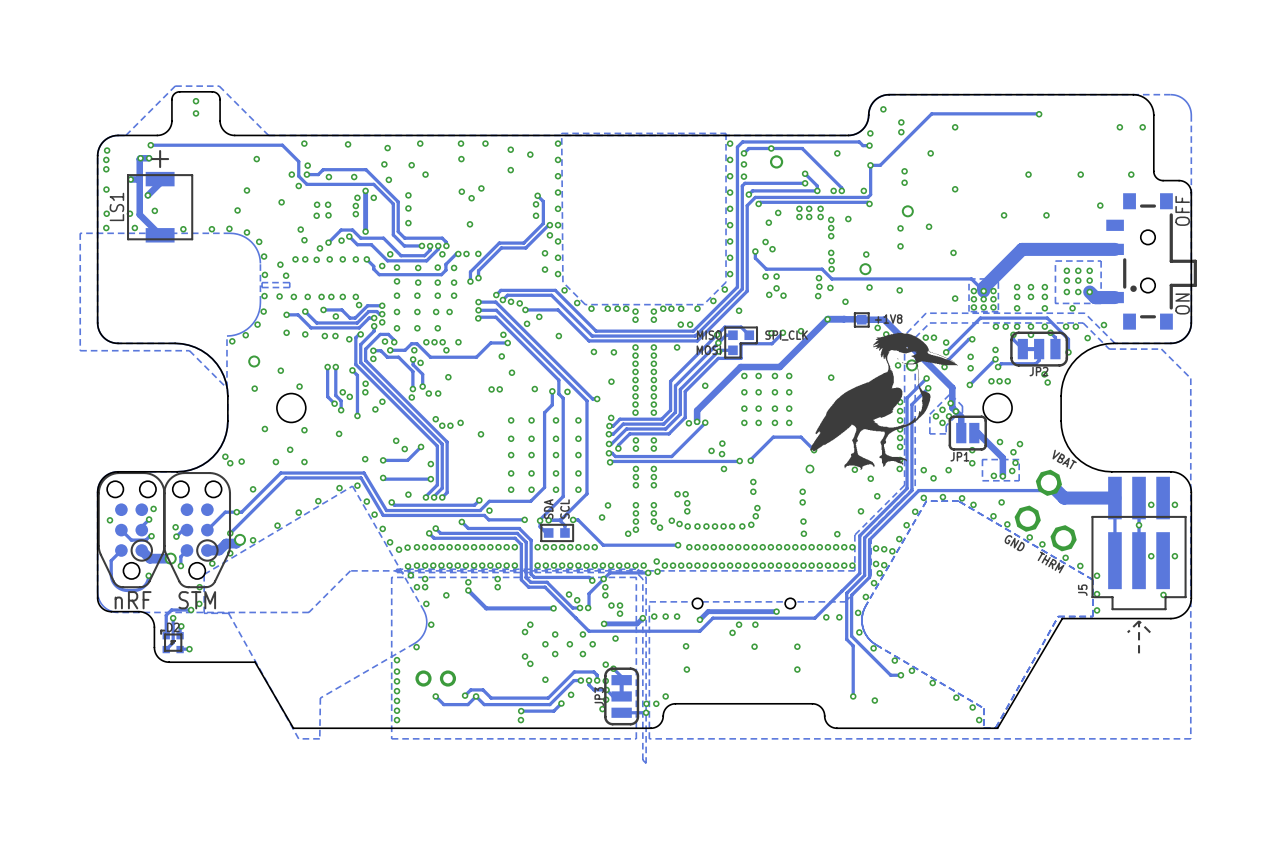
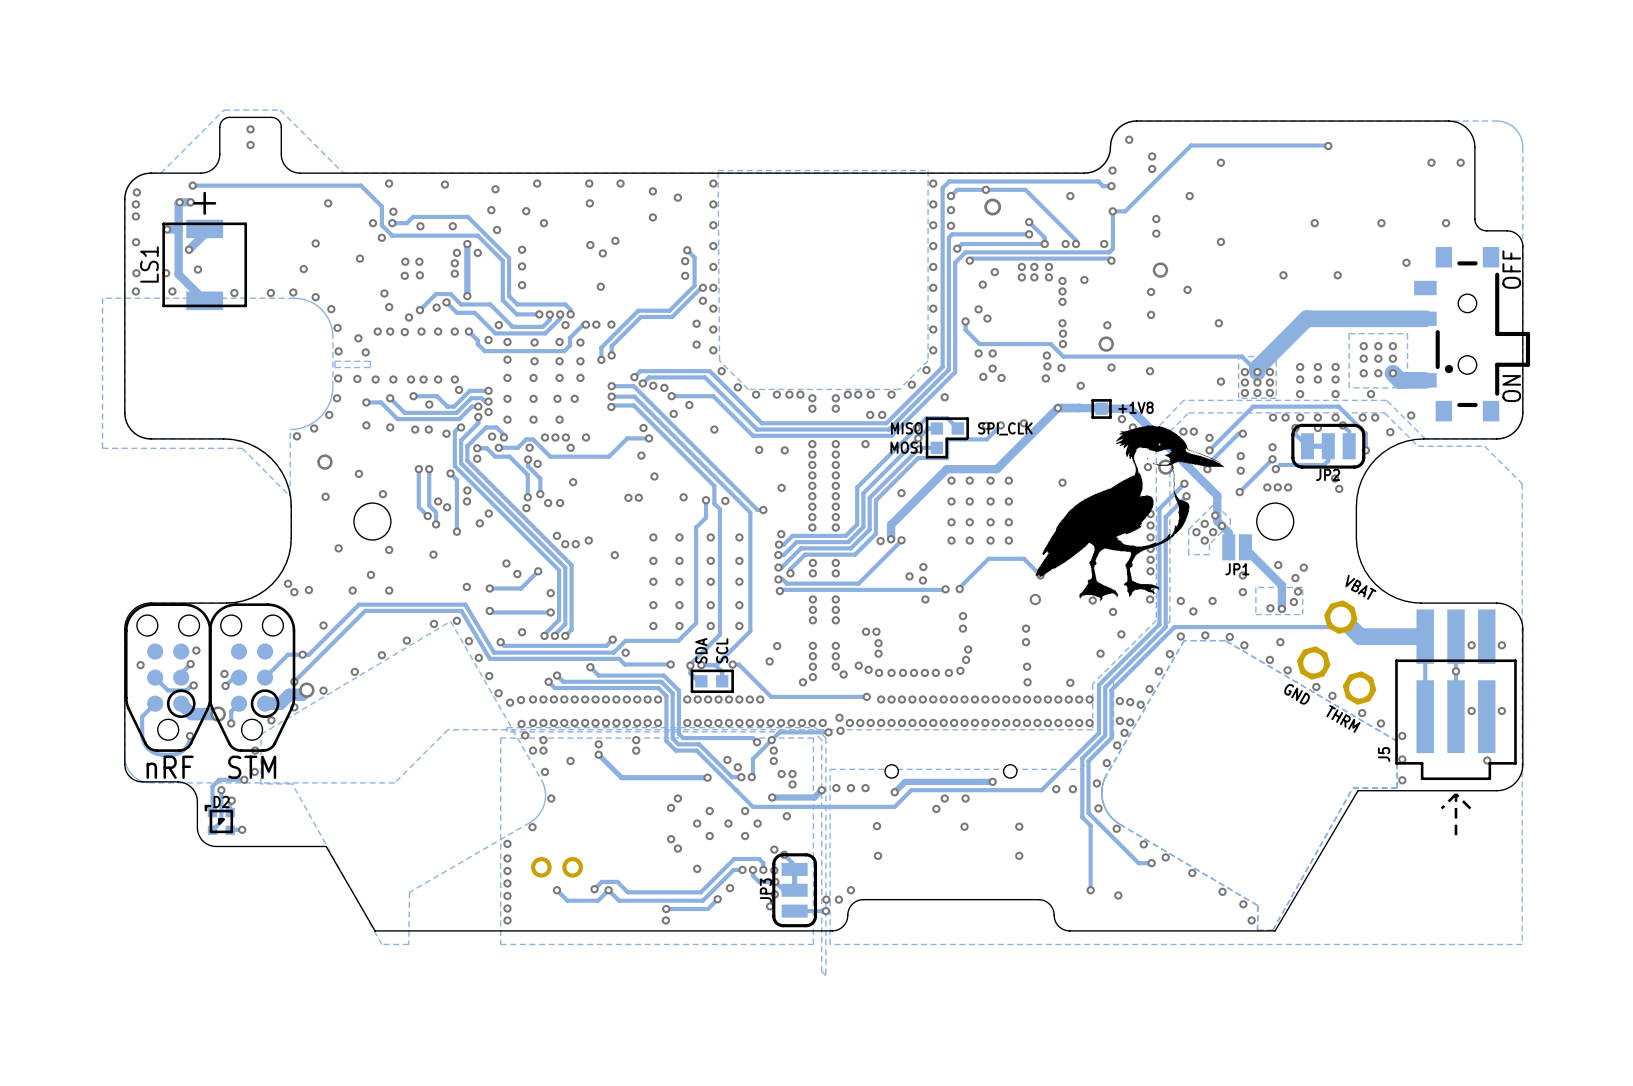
JP1 footprint: [948, 415, 987, 451] -> [1222, 534, 1252, 561]

